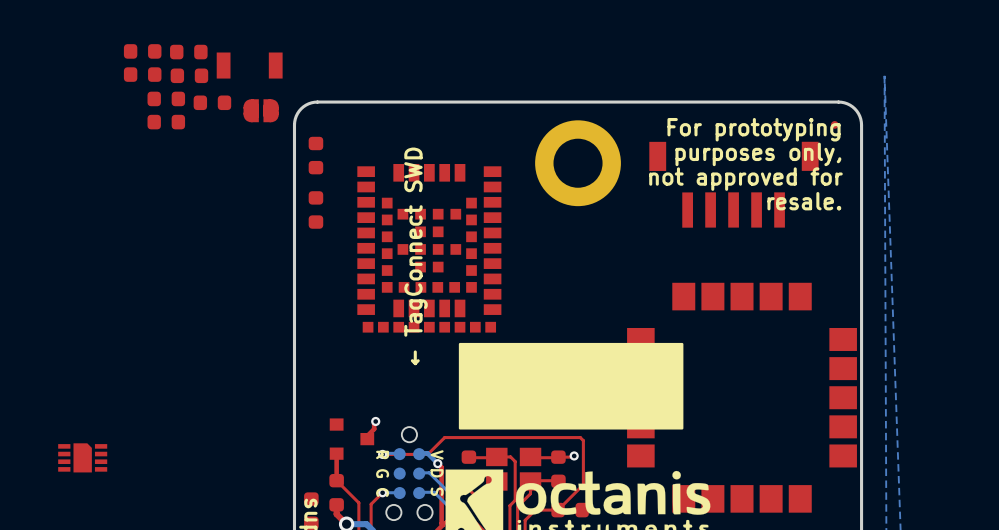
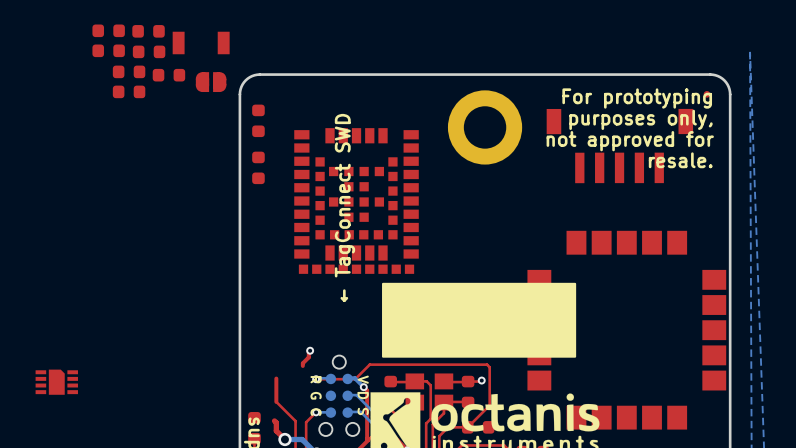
part: (351, 439) -> none
part: (336, 492) -> none

